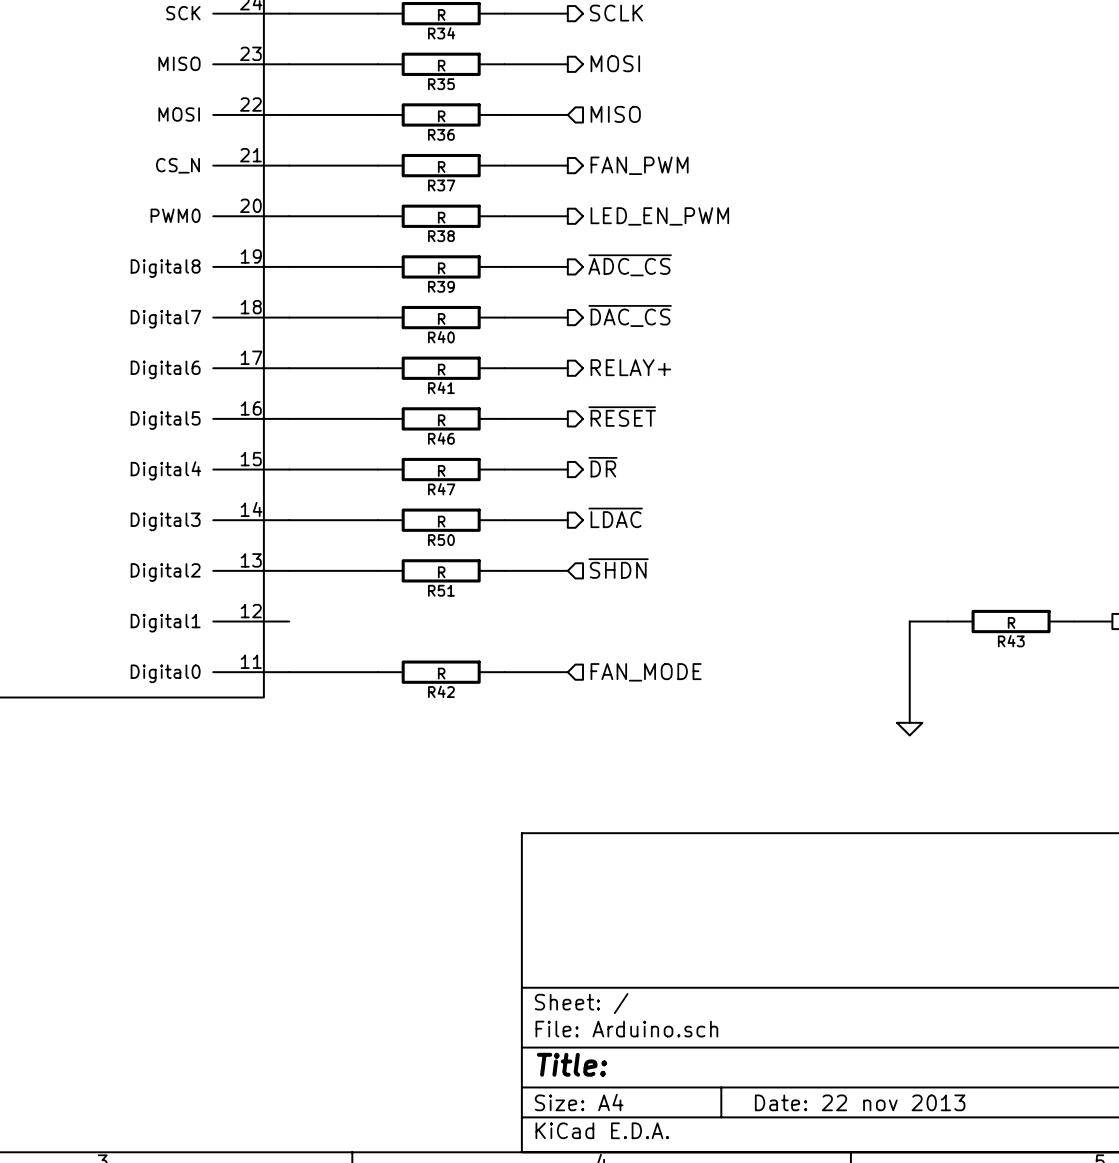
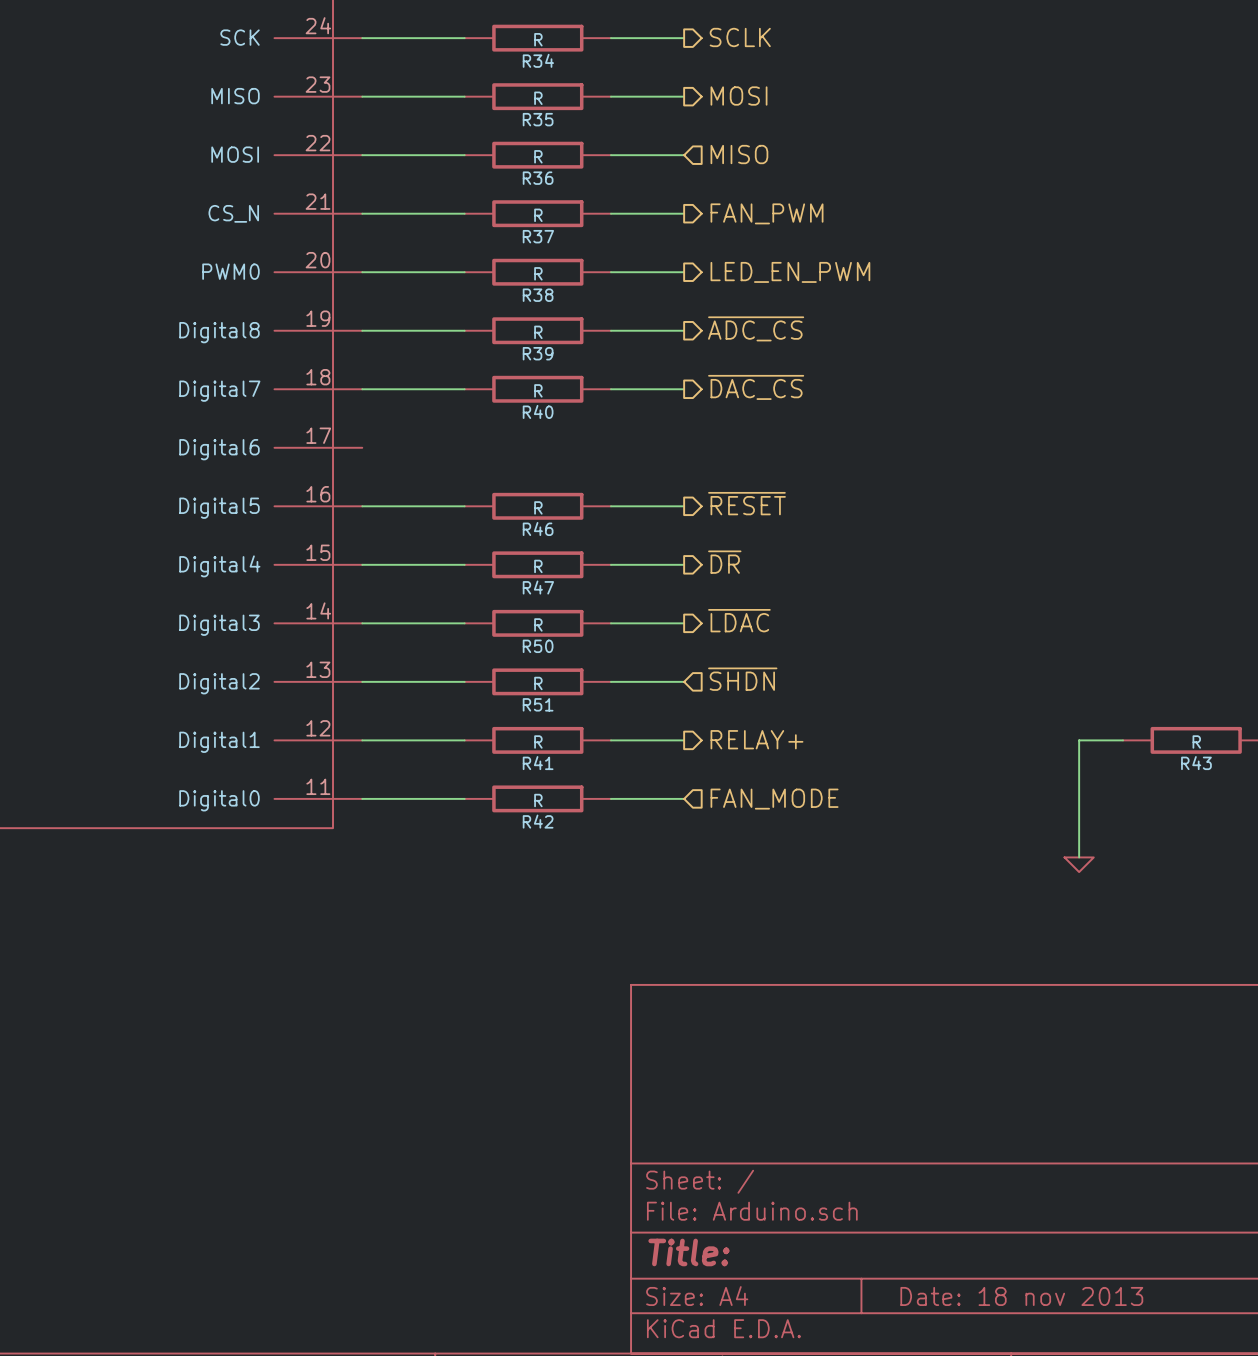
hierarchical label: RELAY+ (630, 367) -> none
wire: (289, 368) (377, 368) -> none
R41 position: (441, 368) -> (537, 740)
wire: (504, 368) (567, 368) -> none
hierarchical label: none -> RELAY+ (756, 739)
wire: none -> (362, 740) (464, 740)
wire: none -> (610, 740) (684, 740)
title block: Date: 22 nov 2013 (860, 1102) -> Date: 18 nov 2013 (1021, 1296)

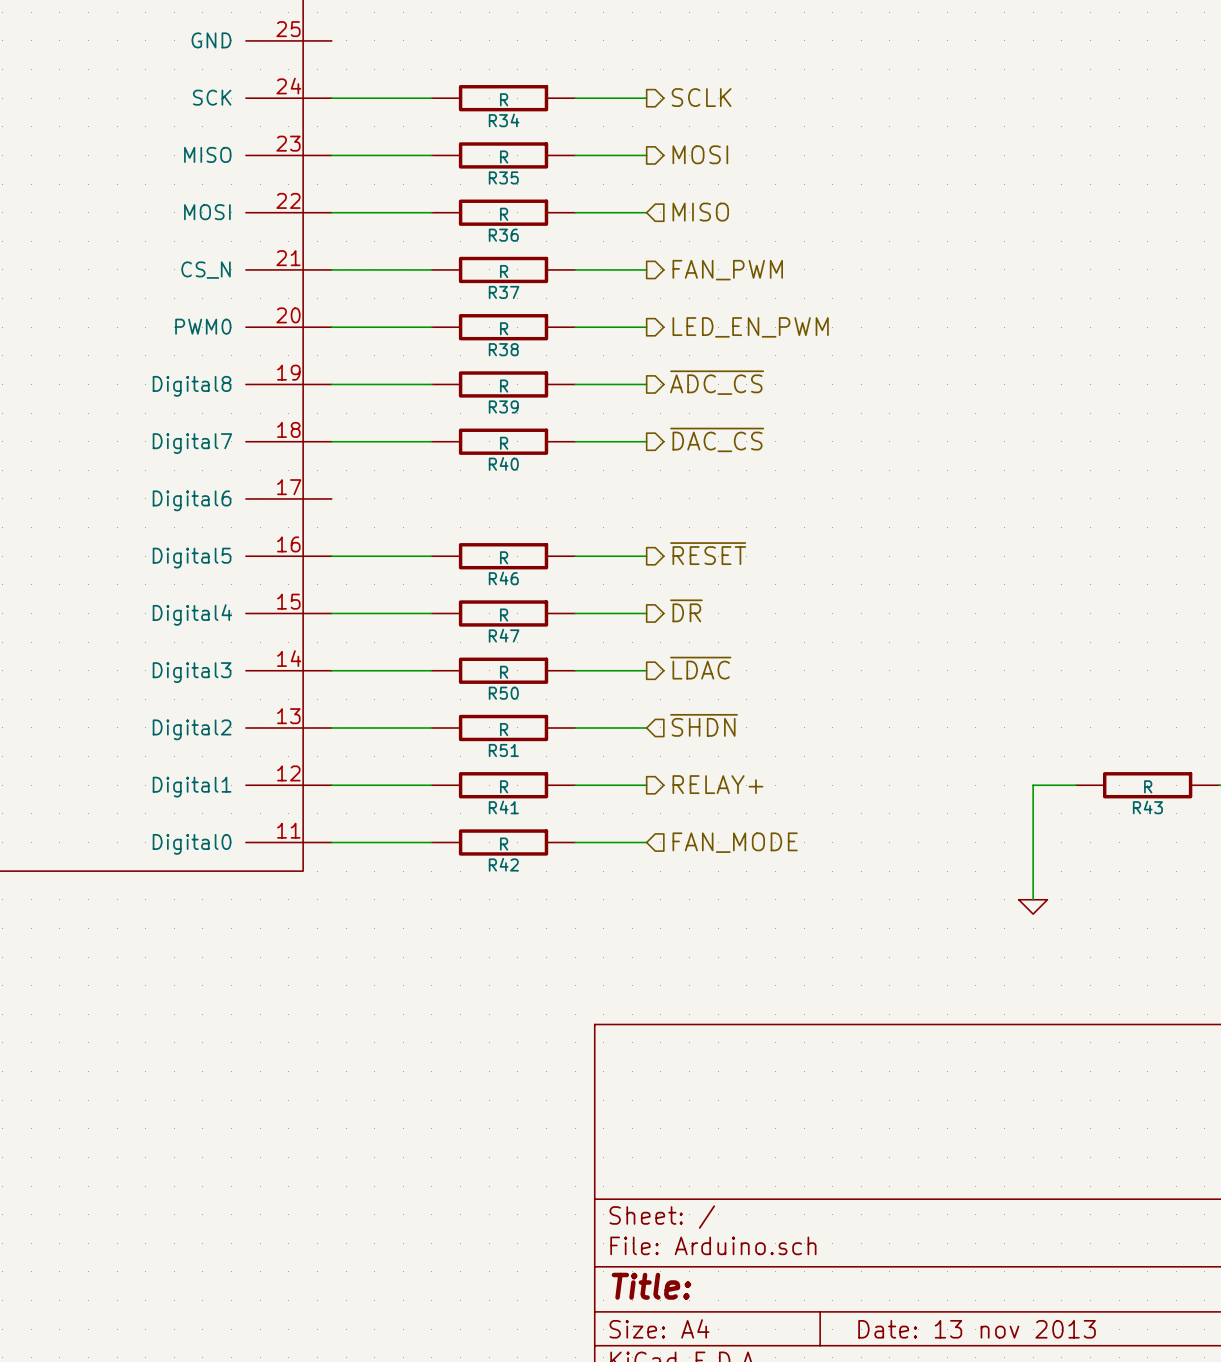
title block: Date: 18 nov 2013 (1021, 1296) -> Date: 13 nov 2013 (977, 1329)

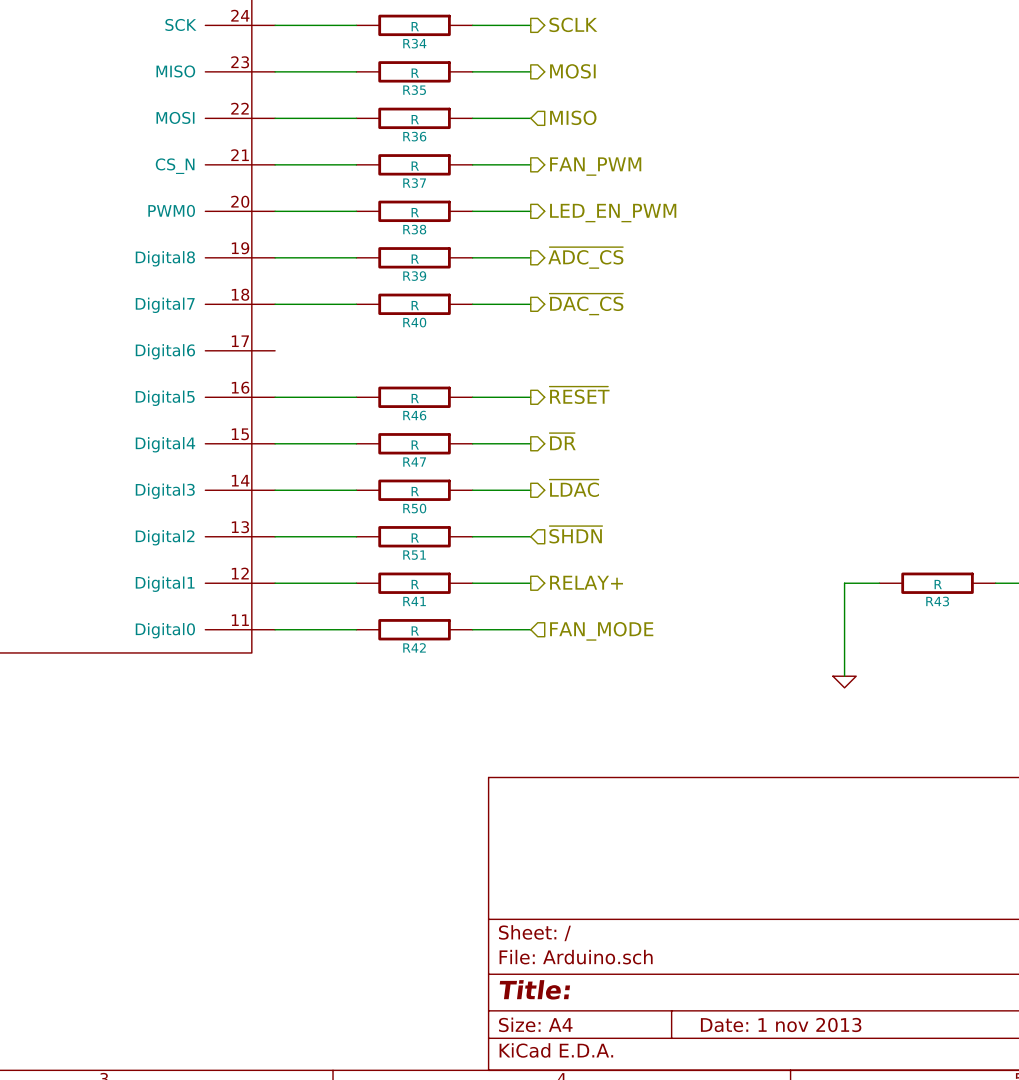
title block: Date: 13 nov 2013 (977, 1329) -> Date: 1 nov 2013 (781, 1024)

